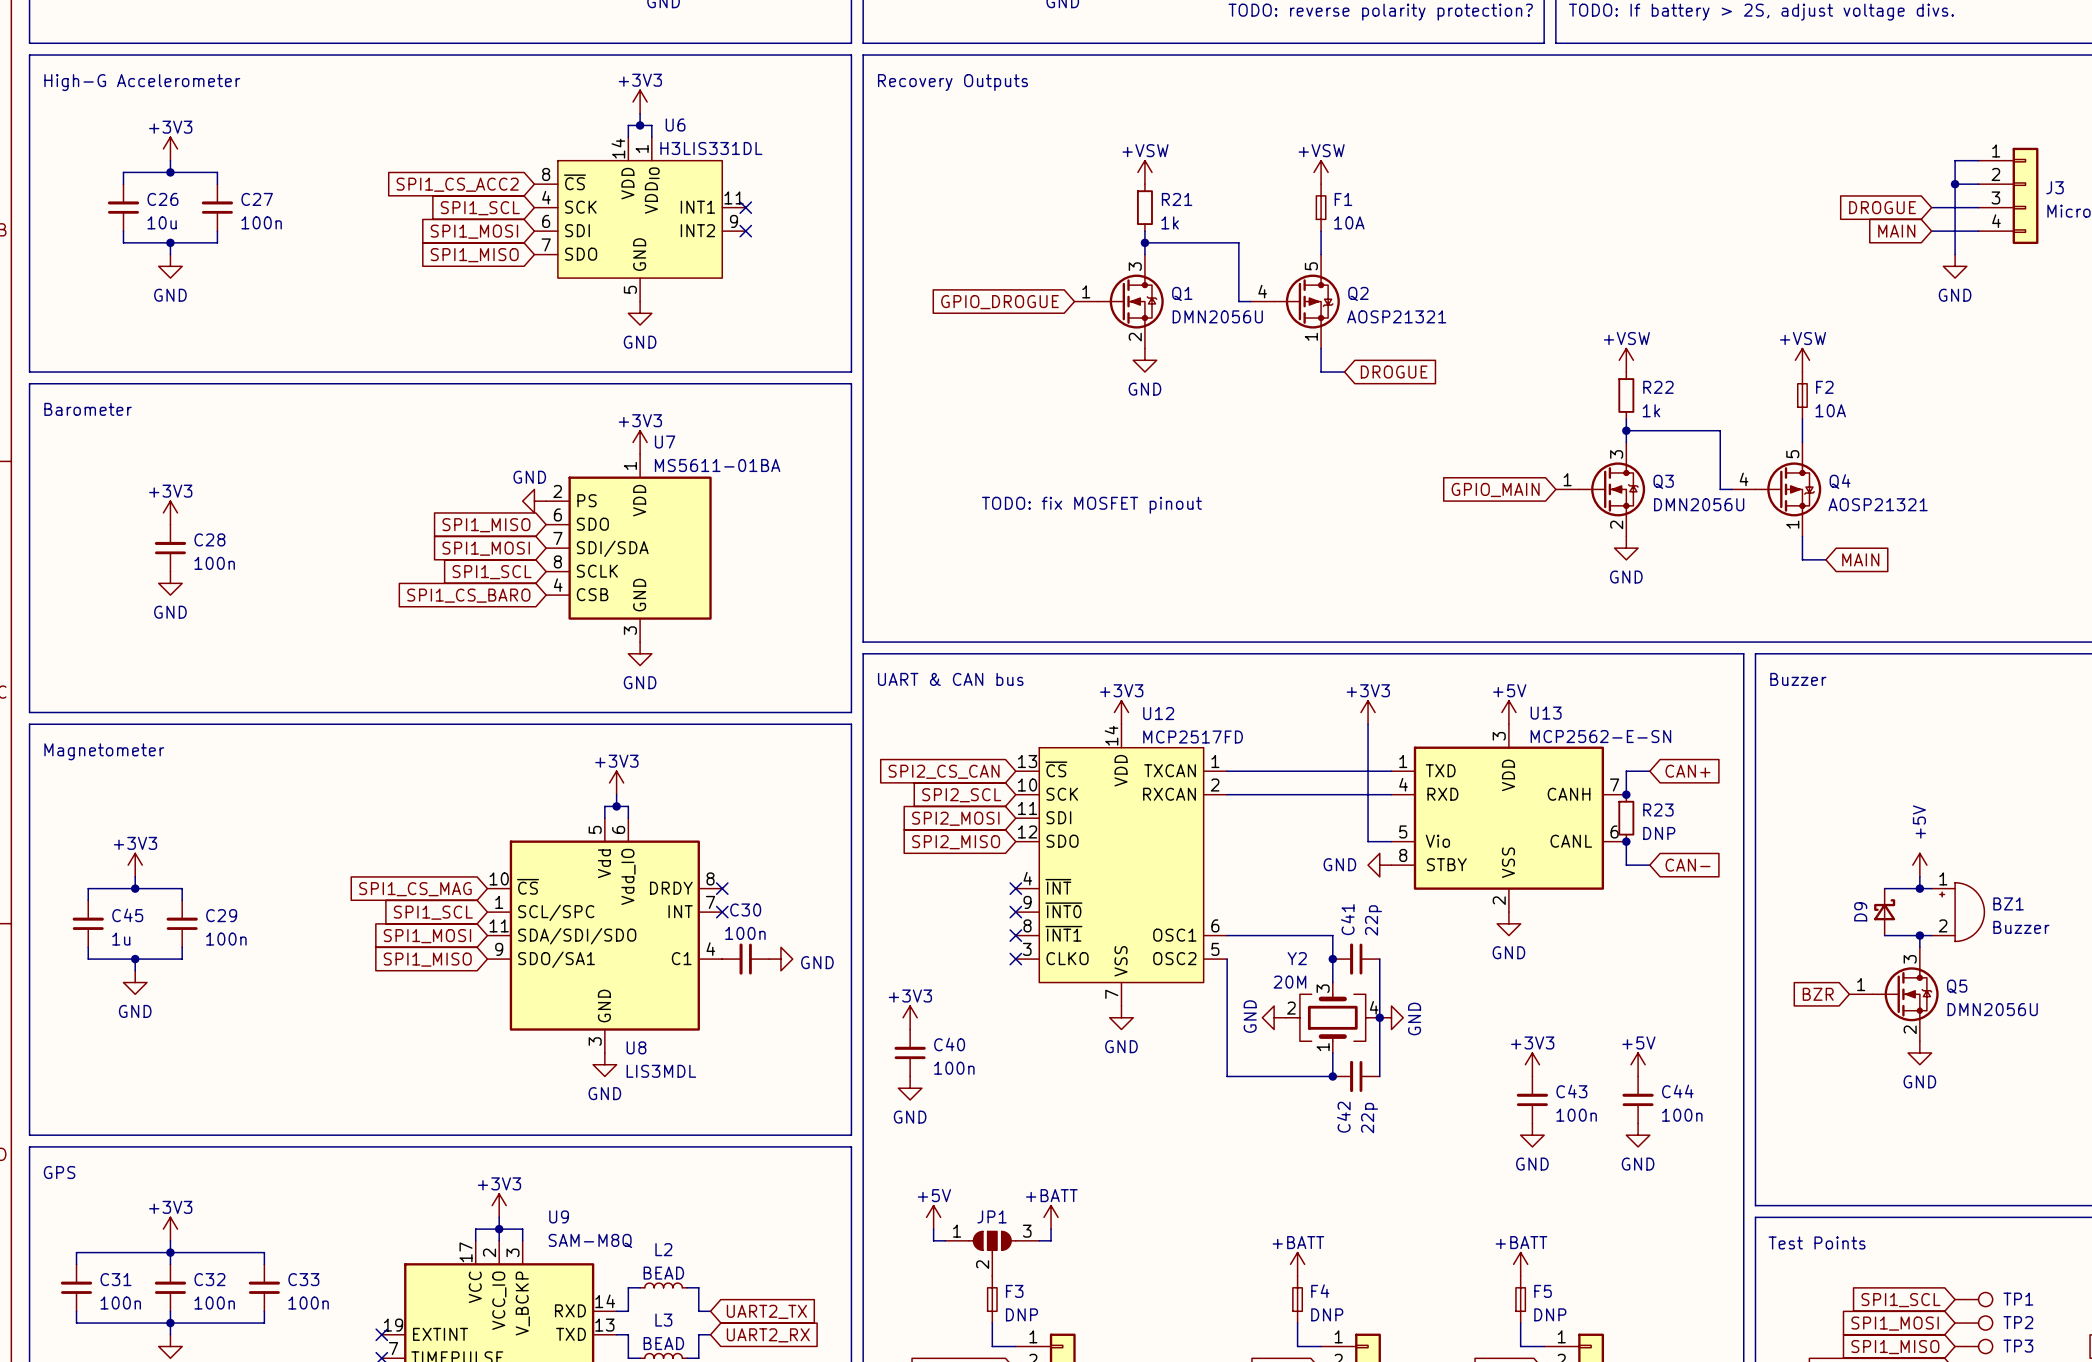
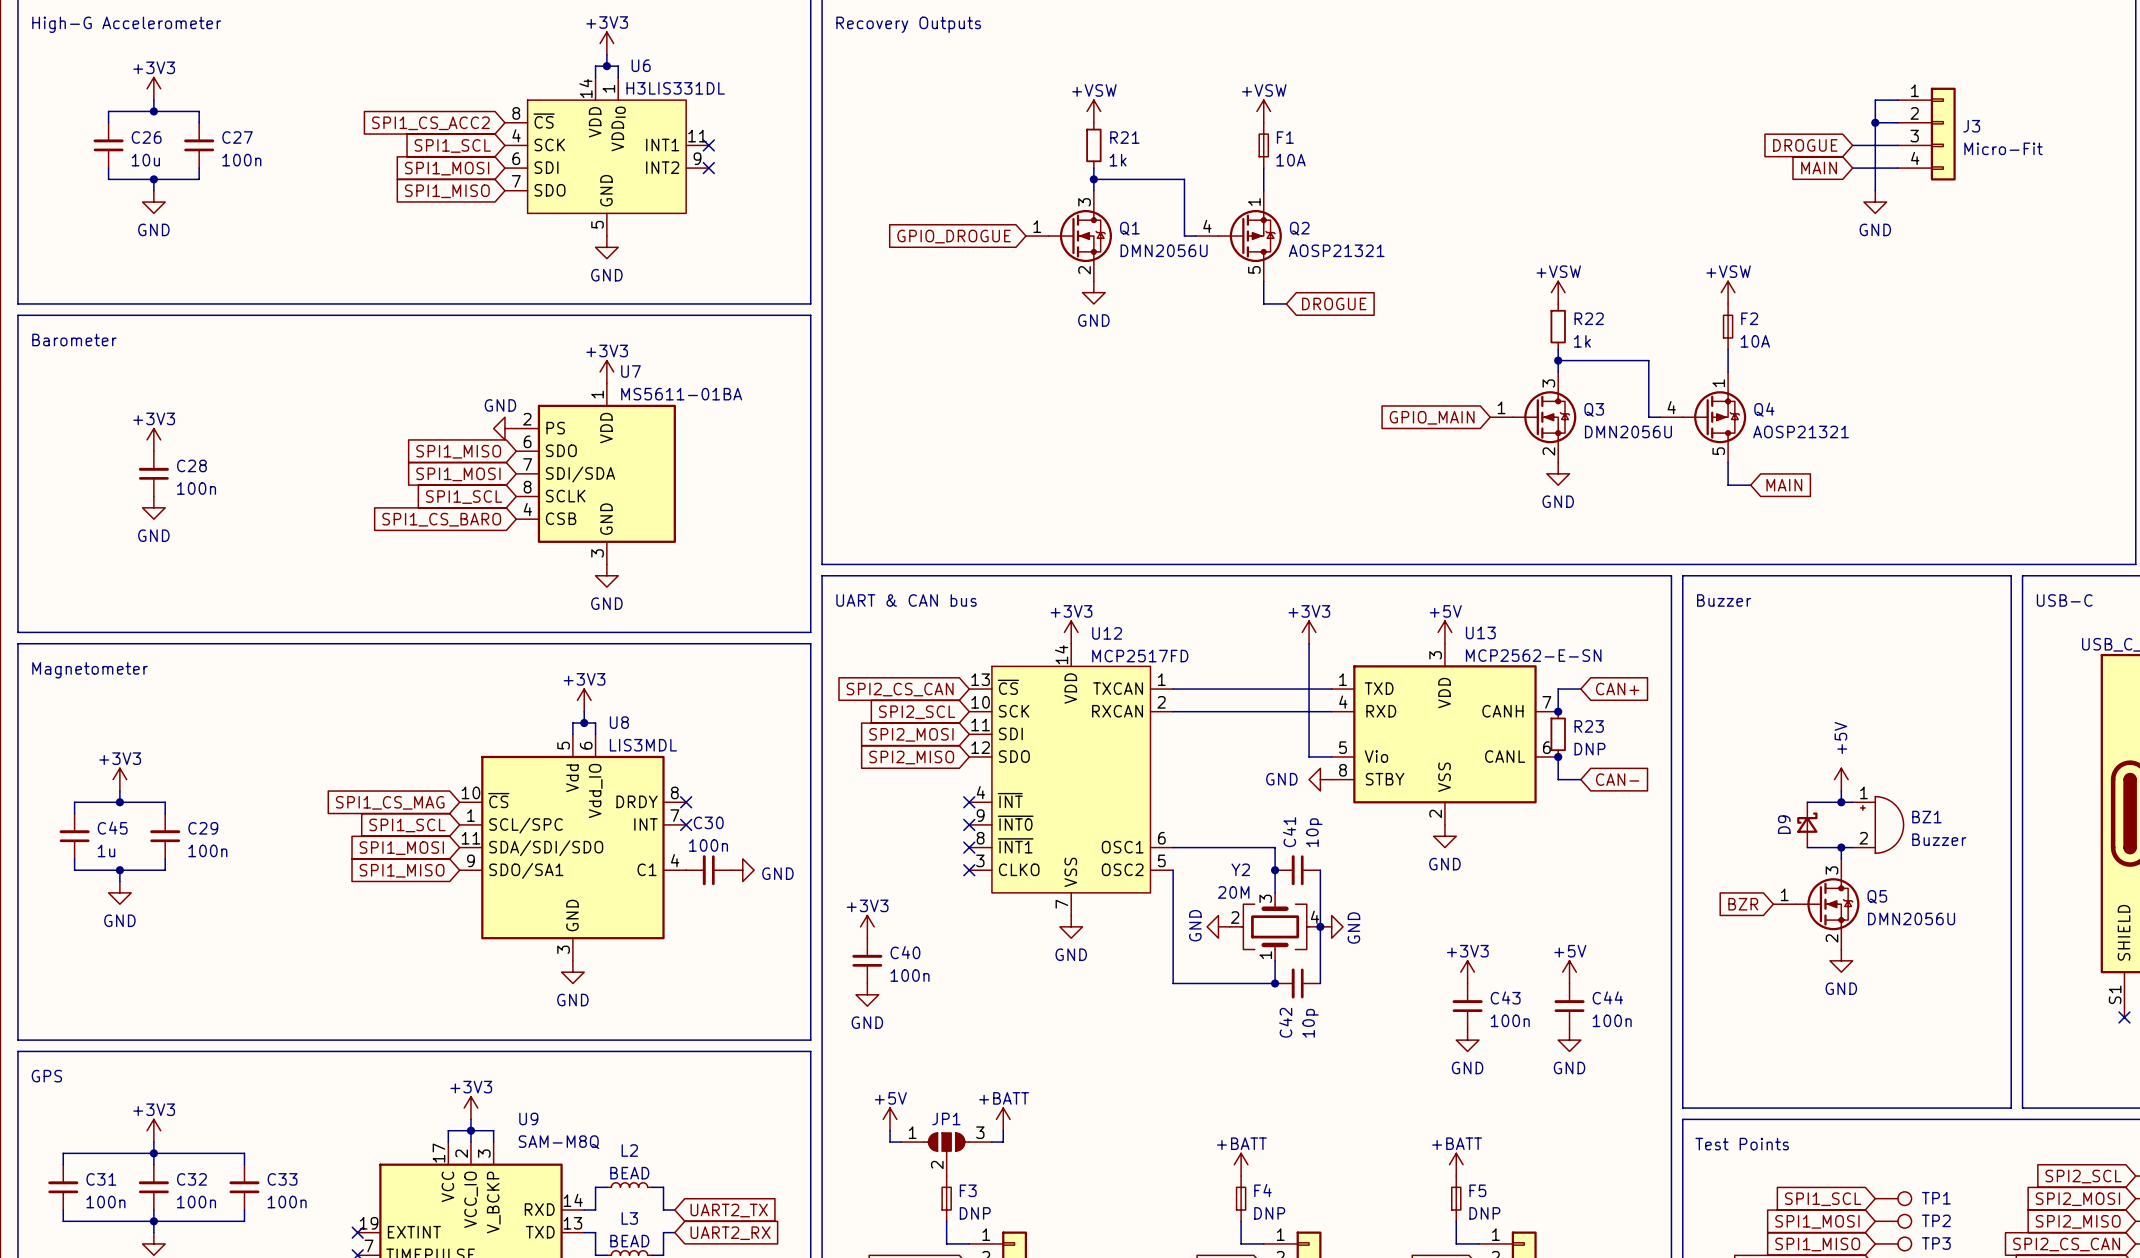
Q2 flip: as is (1306, 301) -> up-down (1250, 236)
Q4 flip: as is (1788, 489) -> up-down (1714, 417)
text: TODO: fix MOSFET pinout (1091, 505) -> none
C41 value: 22p (1373, 920) -> 10p (1314, 832)
U8 name position: U8 (636, 1047) -> U8 (619, 722)
U8 value position: LIS3MDL (661, 1071) -> LIS3MDL (643, 745)
C42 value: 22p (1369, 1118) -> 10p (1310, 1023)

